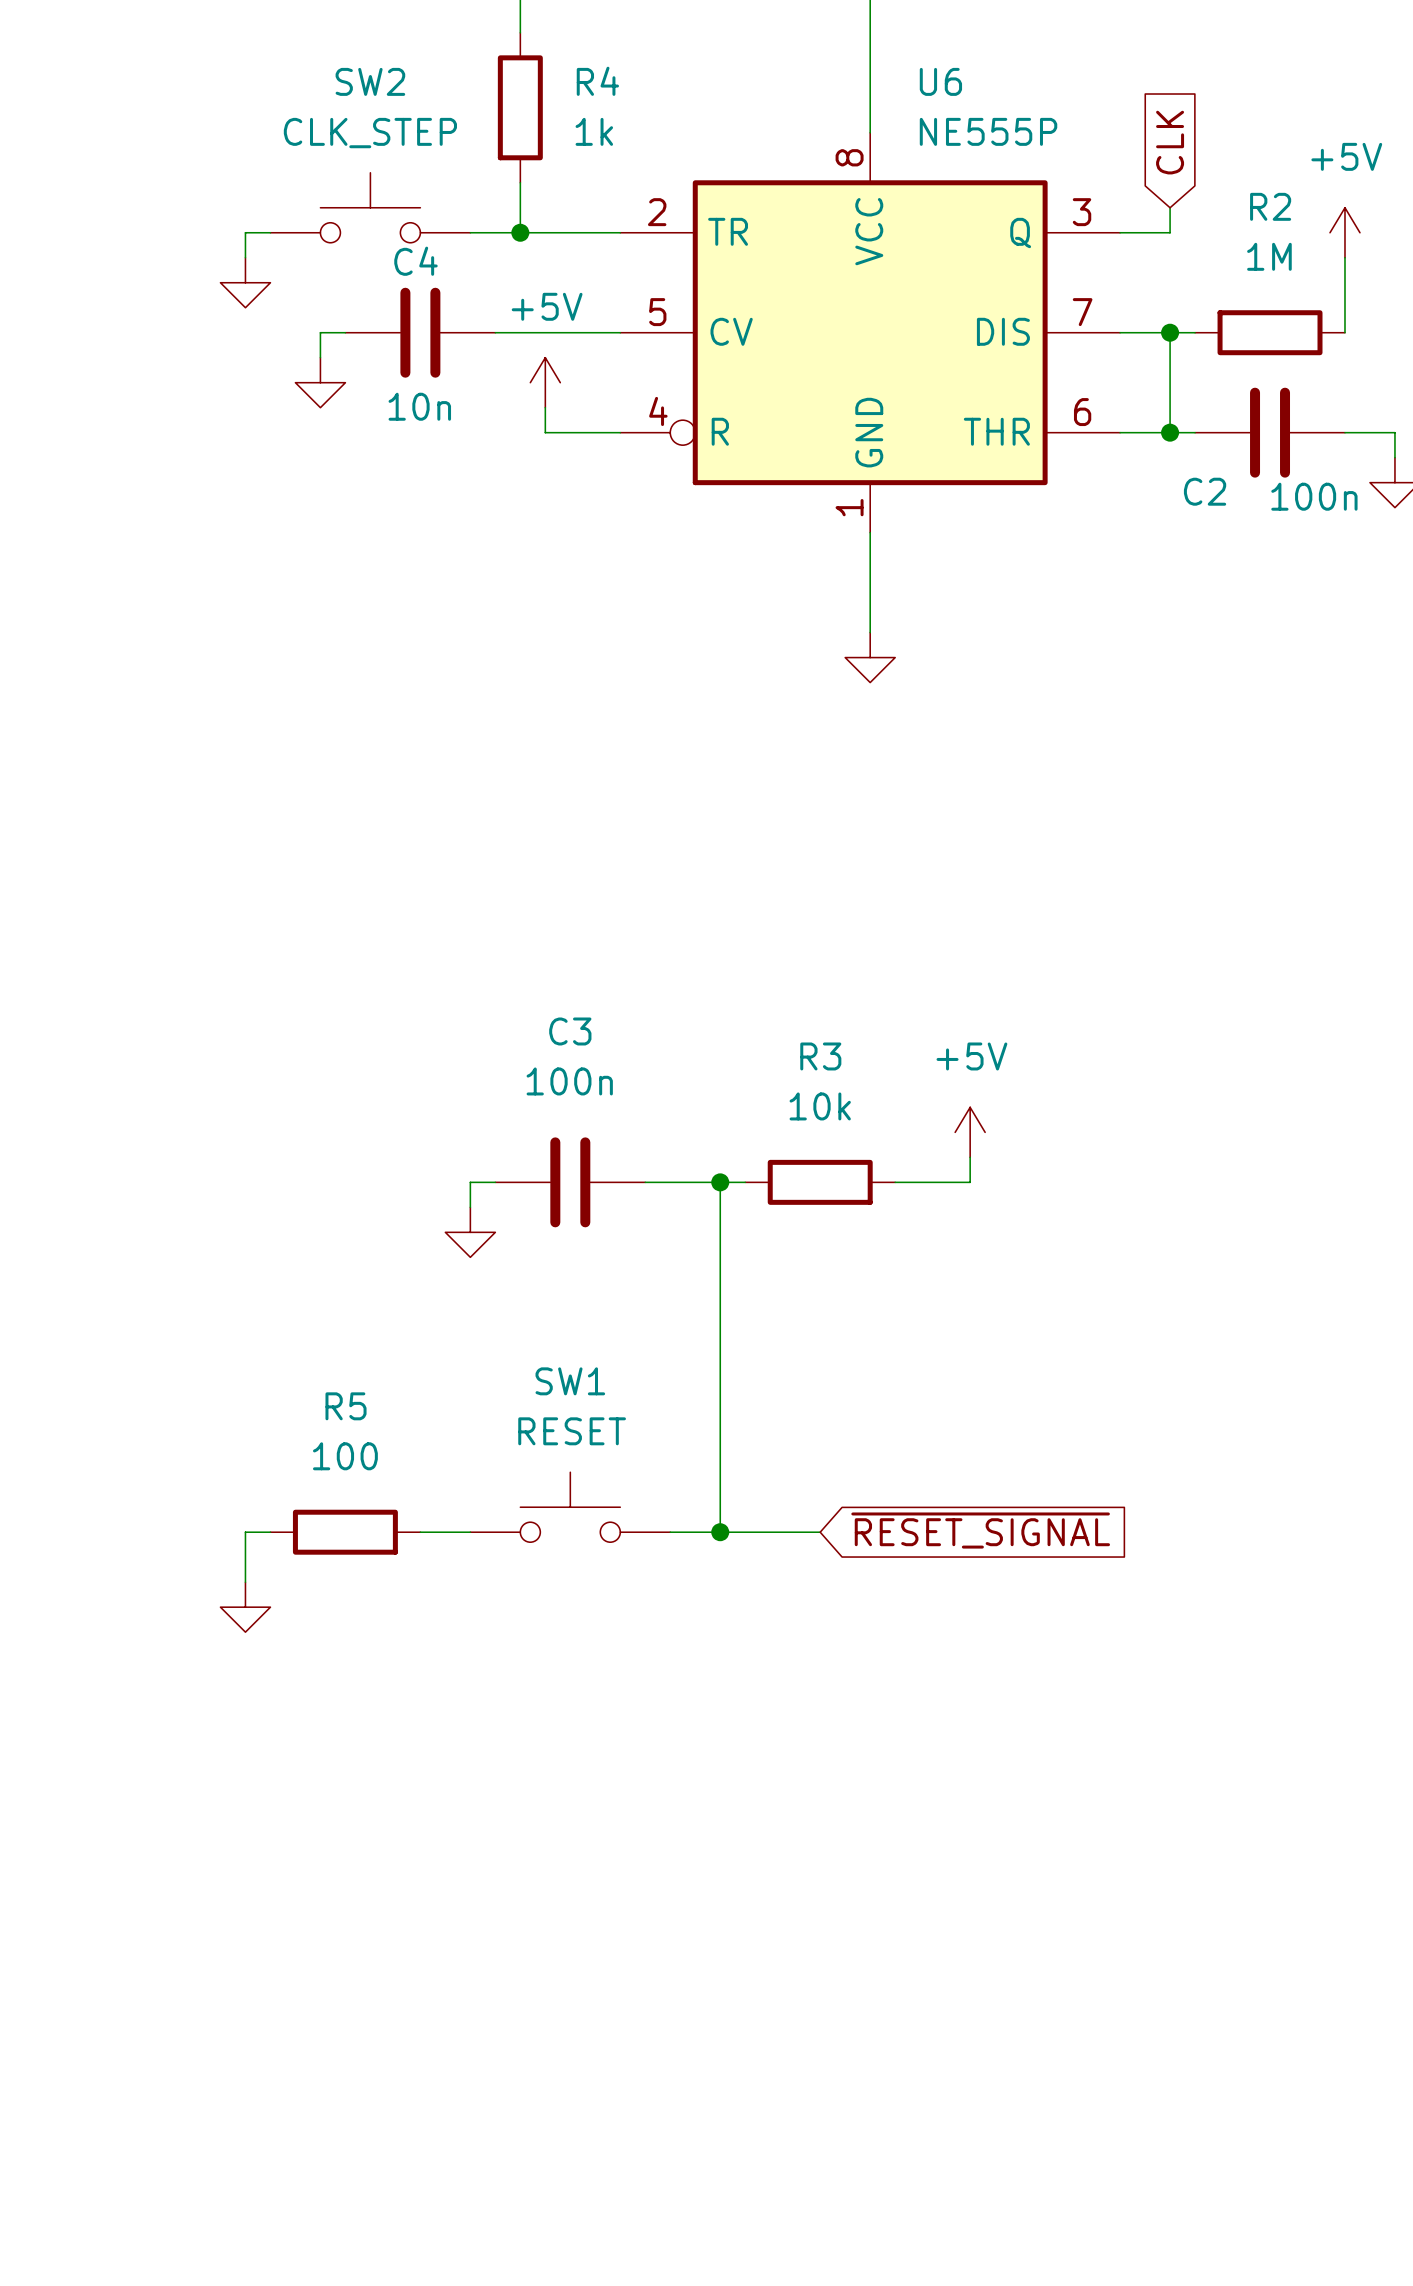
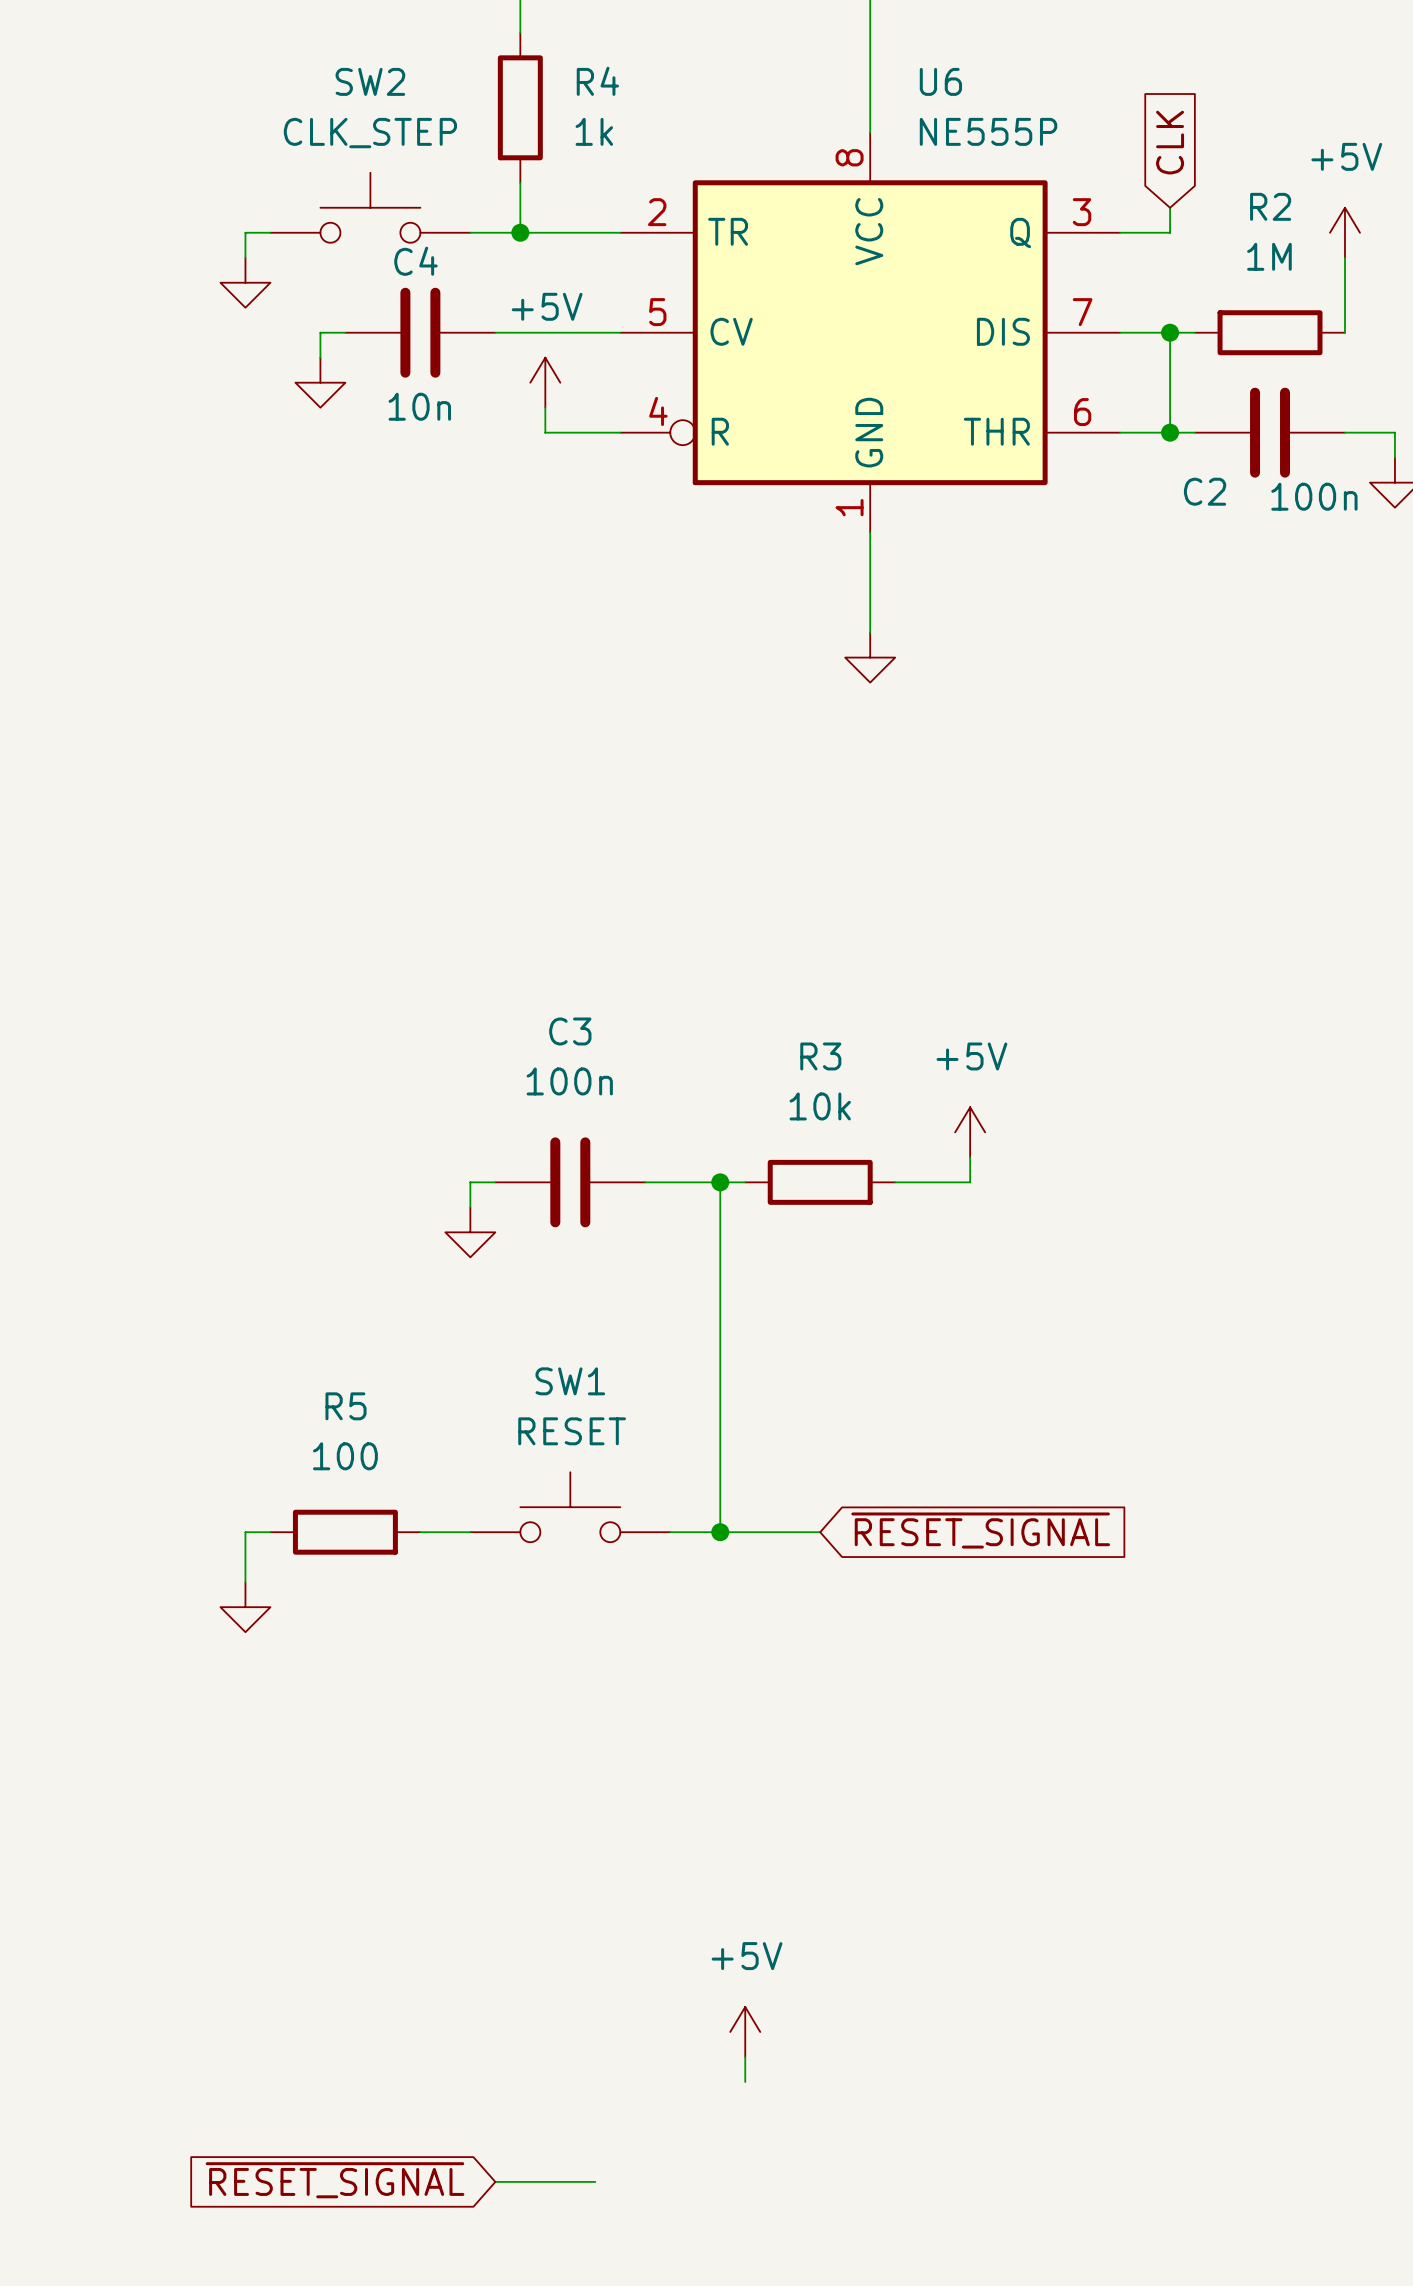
power symbol: none -> +5V (745, 2031)
wire: none -> (745, 2056) (745, 2081)
global label: none -> ~{RESET_SIGNAL} (335, 2180)
wire: none -> (495, 2181) (595, 2181)

